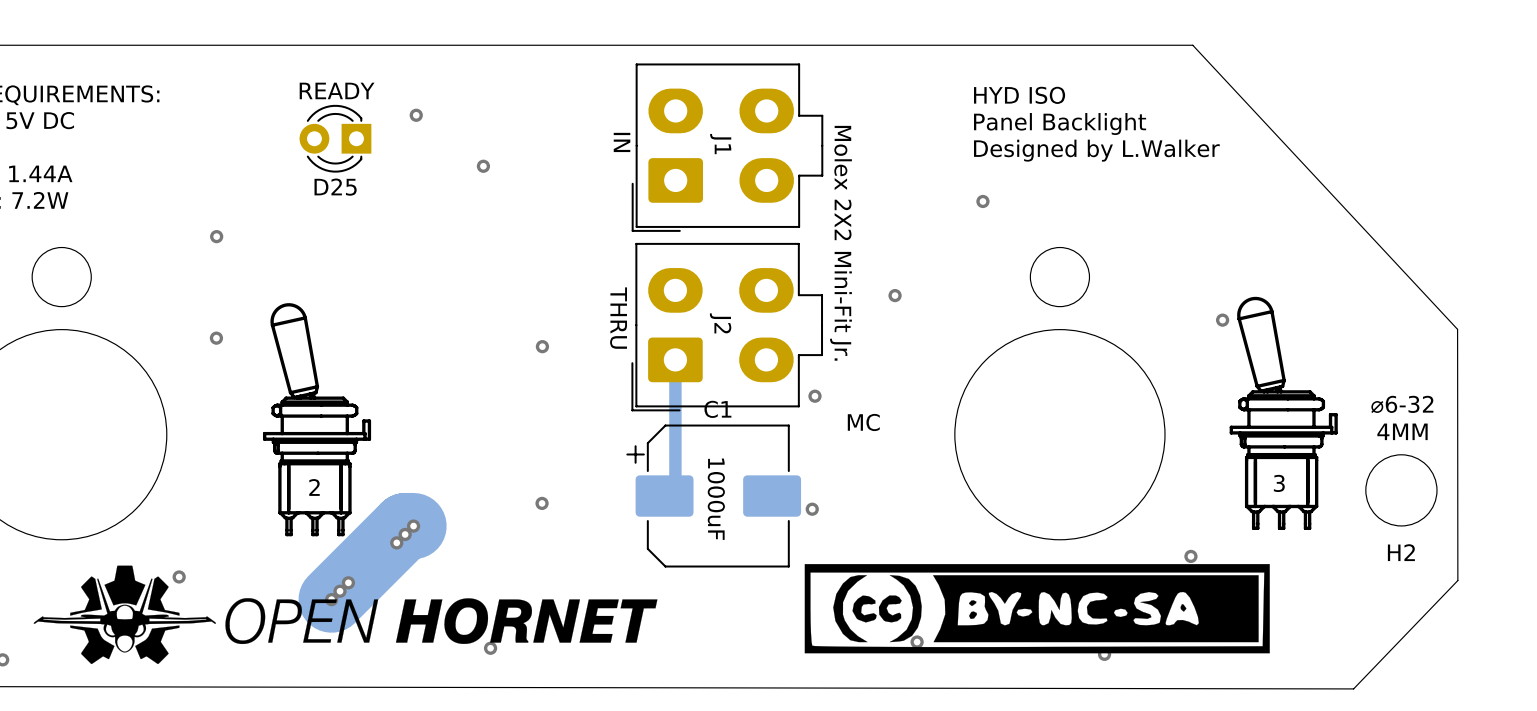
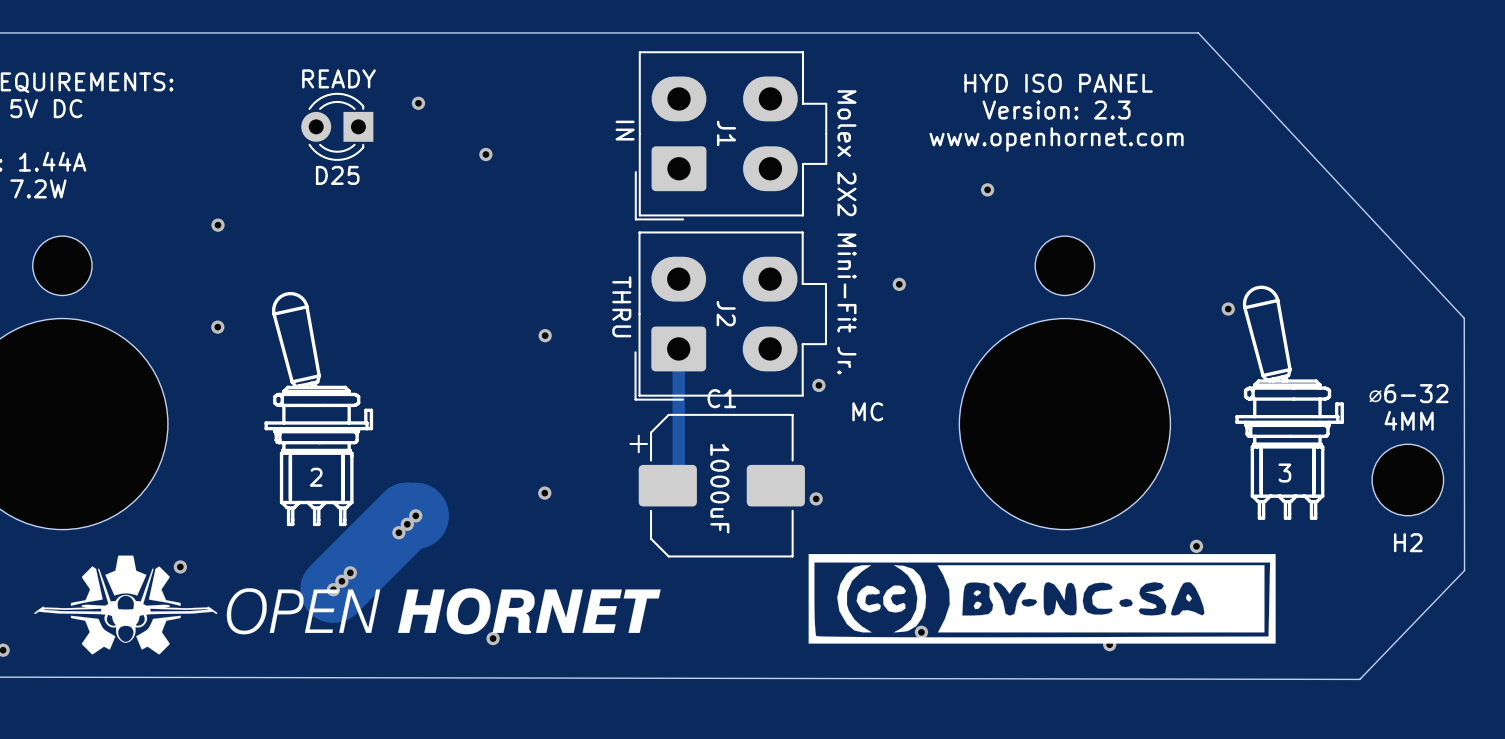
text: HYD ISO (1019, 95) -> HYD ISO PANEL (1058, 83)
text: none -> Version: 2.3 (1056, 110)
text: Panel Backlight (1060, 123) -> none
text: none -> www.openhornet.com (1056, 139)
text: Designed by L.Walker (1096, 150) -> none

